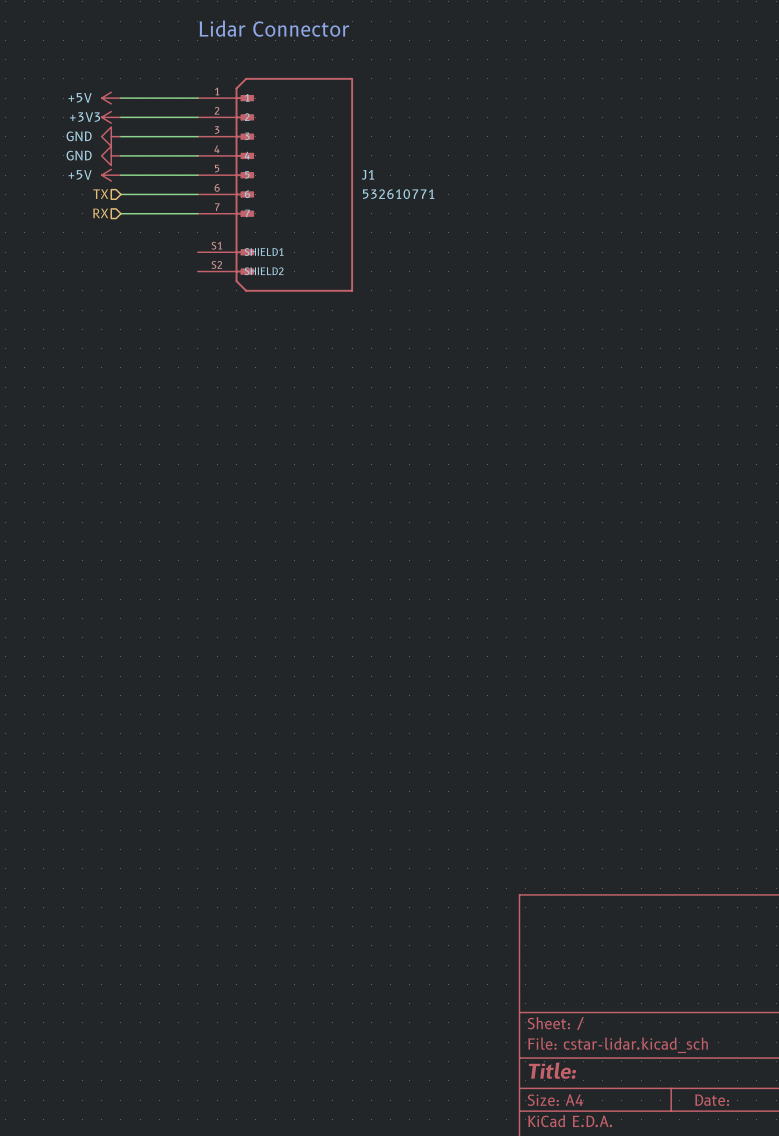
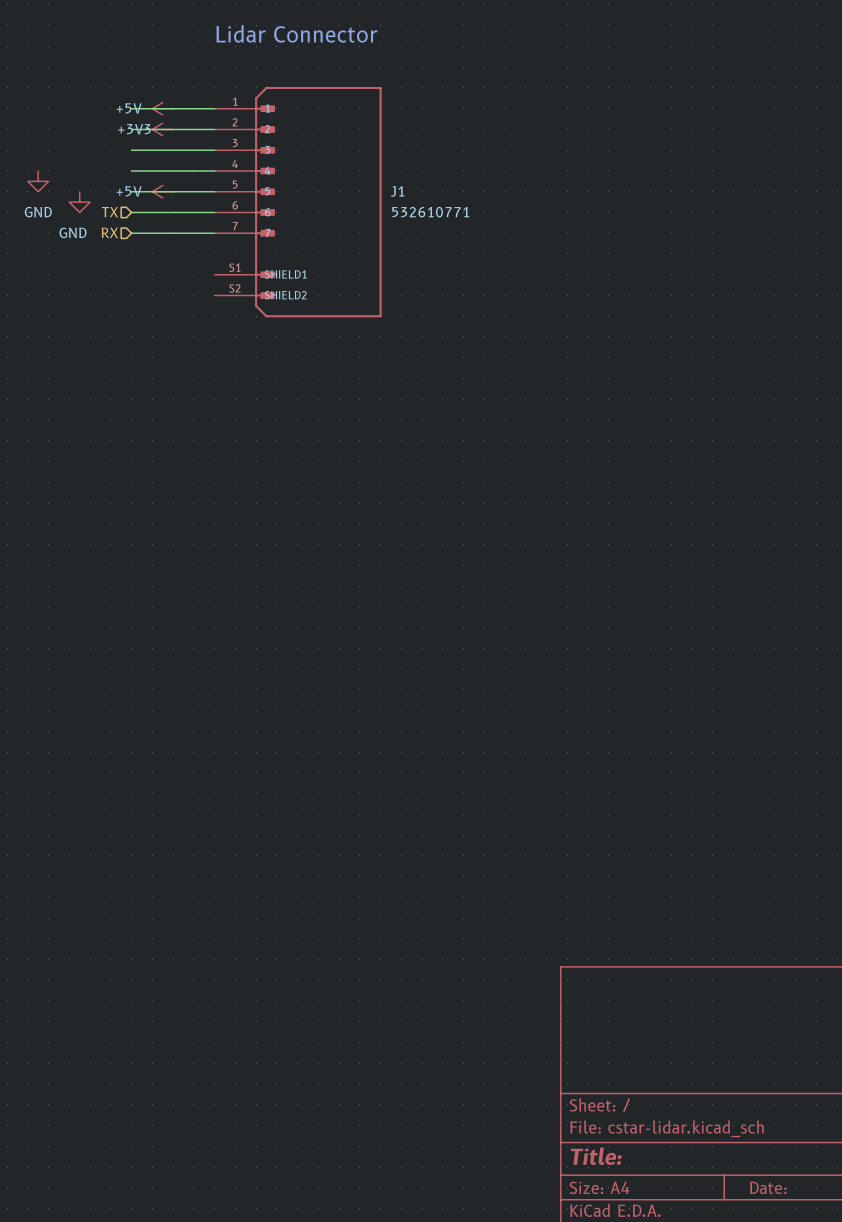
power symbol position: +5V (111, 98) -> +5V (162, 108)
power symbol position: +3V3 (111, 117) -> +3V3 (162, 129)
power symbol: GND (111, 136) -> none
power symbol: GND (111, 155) -> none
power symbol: none -> GND (38, 181)
power symbol position: +5V (111, 175) -> +5V (162, 191)
power symbol: none -> GND (79, 202)

